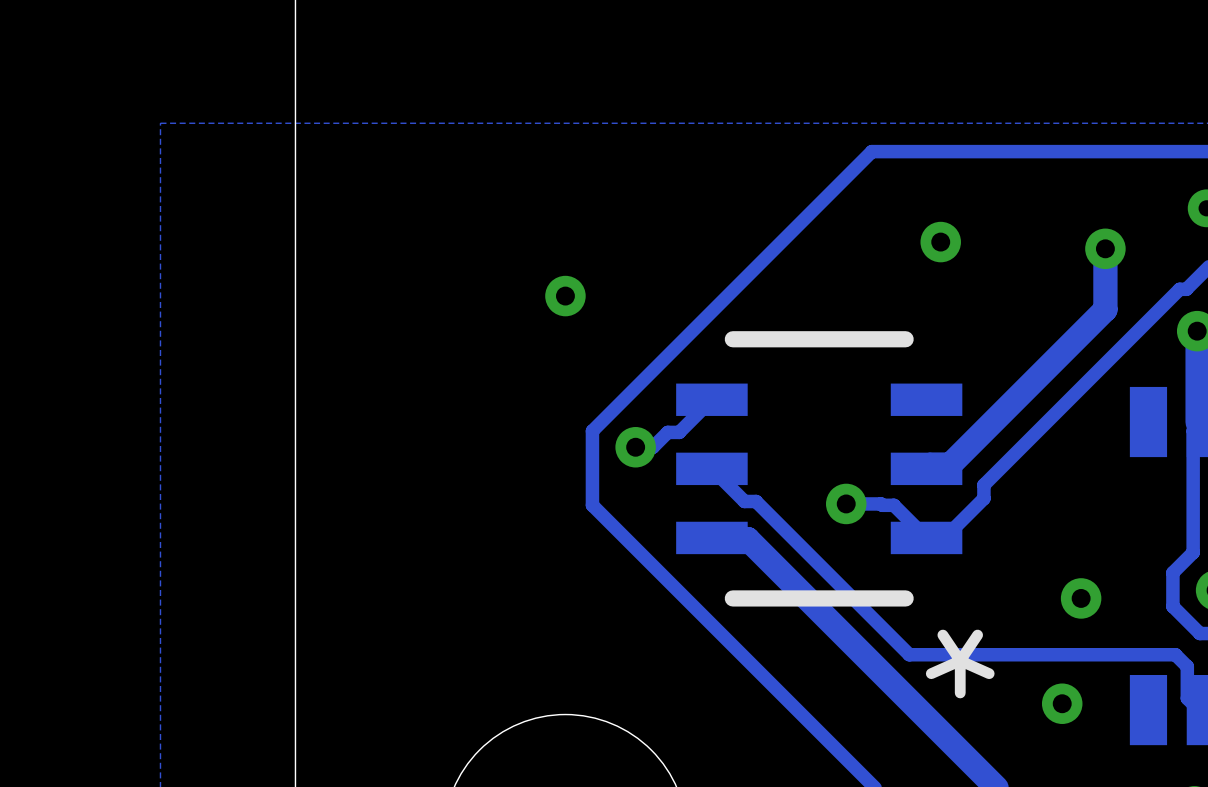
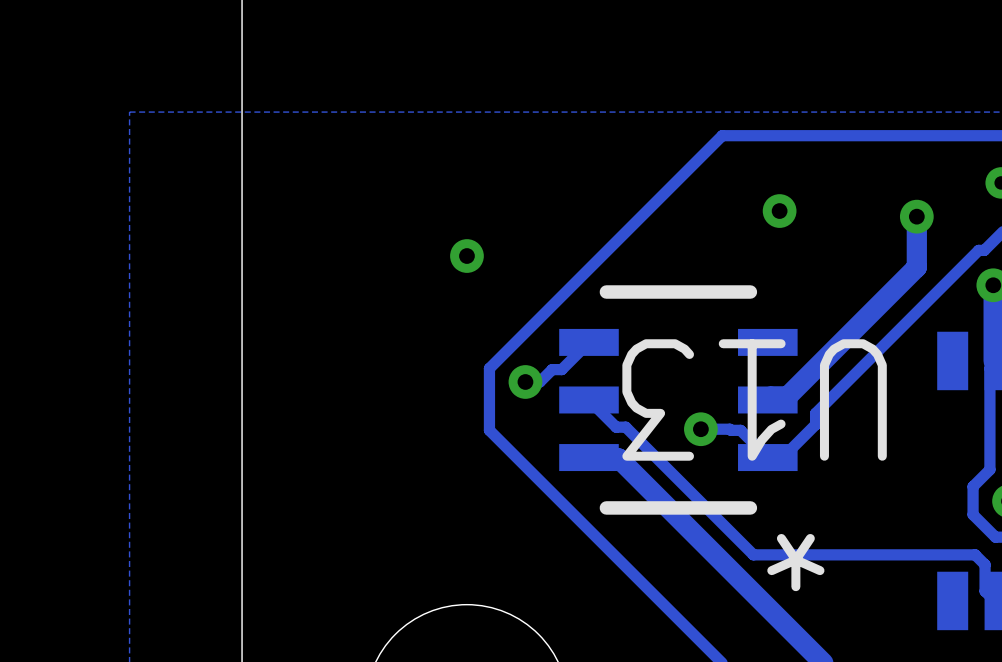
U13 name: none -> U13 (754, 399)
via: (1081, 598) -> none
via: (1062, 703) -> none

